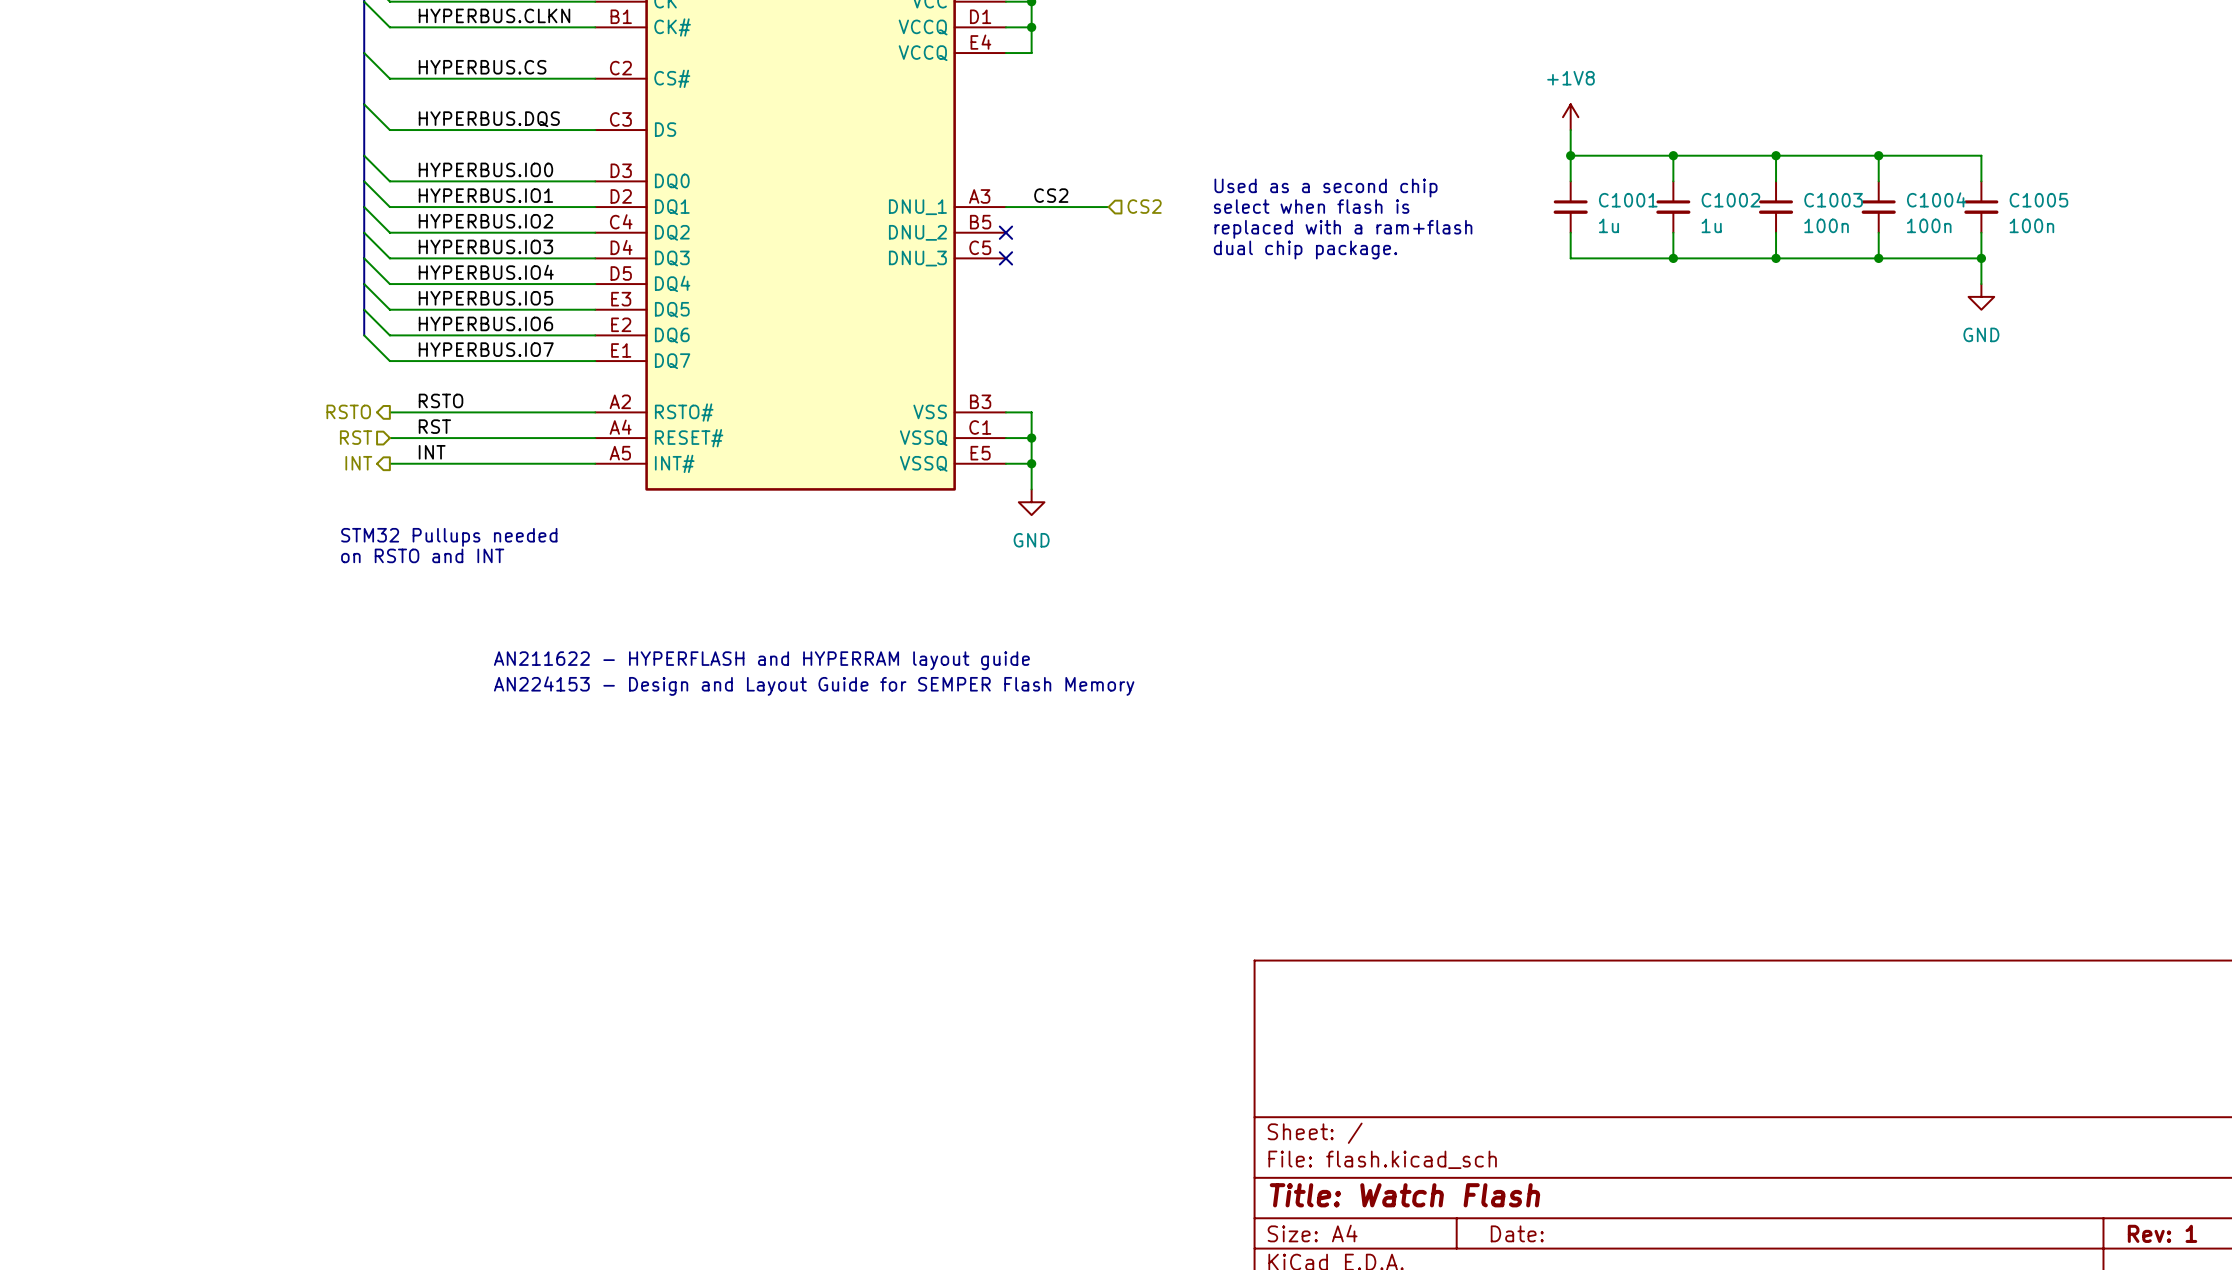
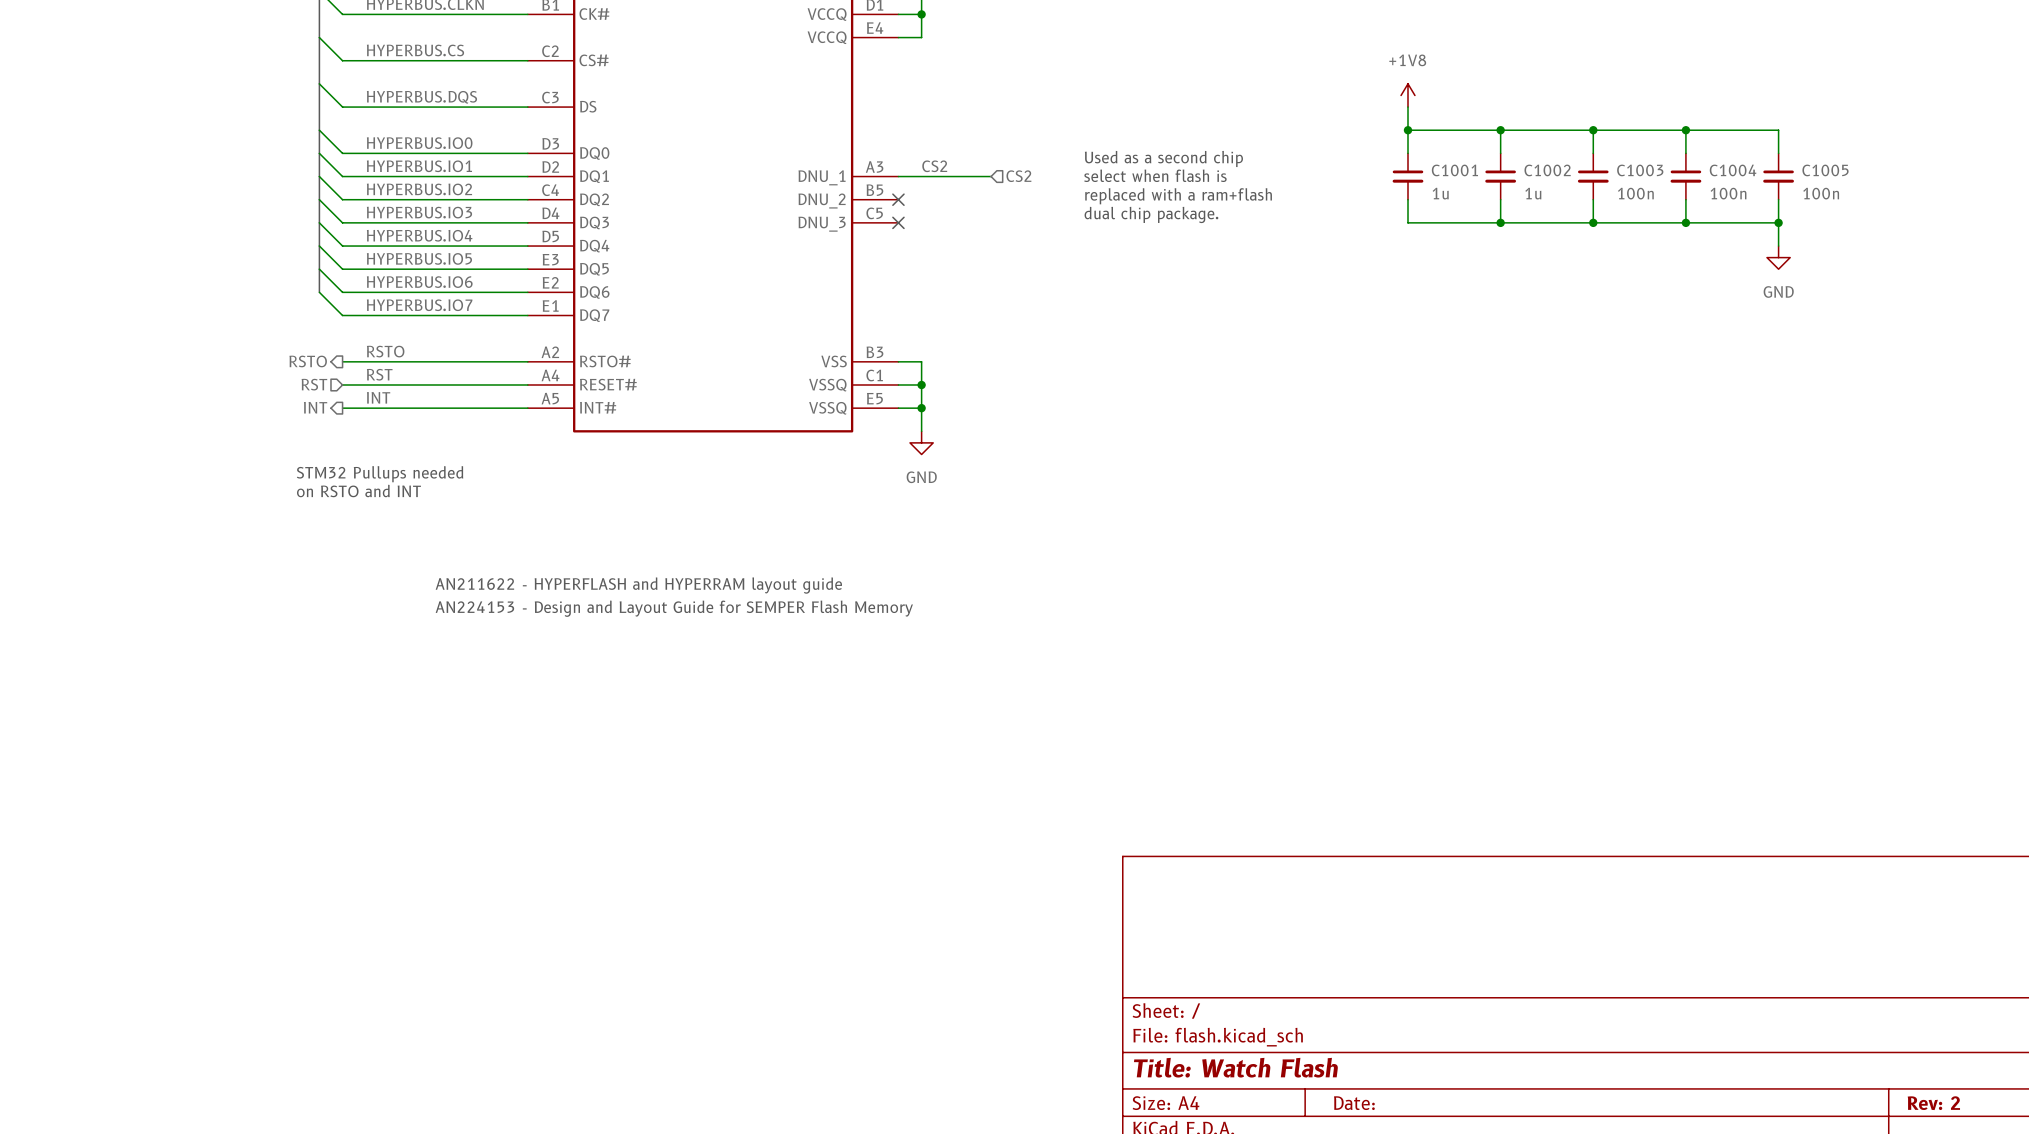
title block: Rev: 1 (2162, 1233) -> Rev: 2 (1933, 1103)

